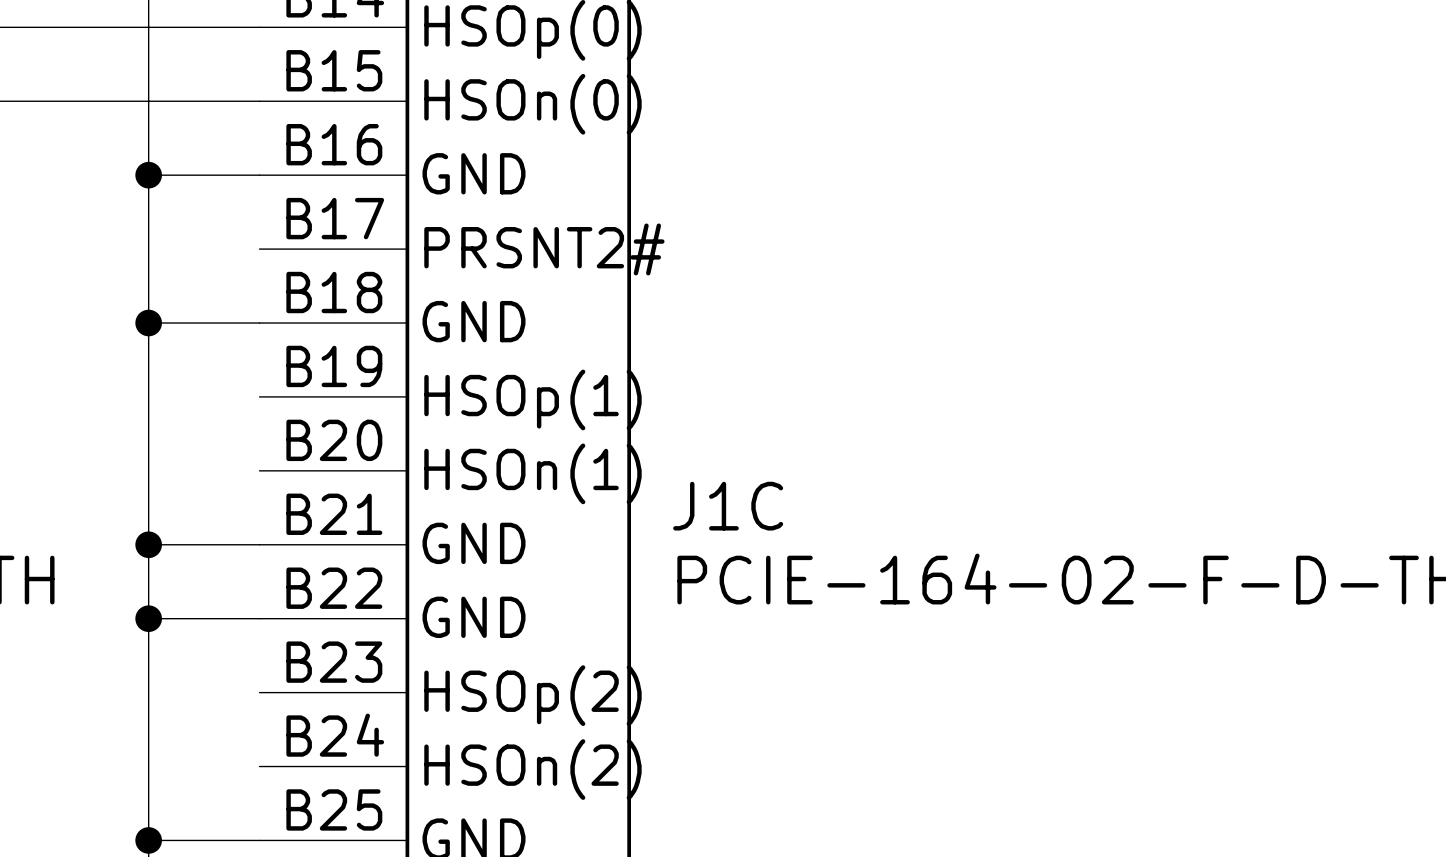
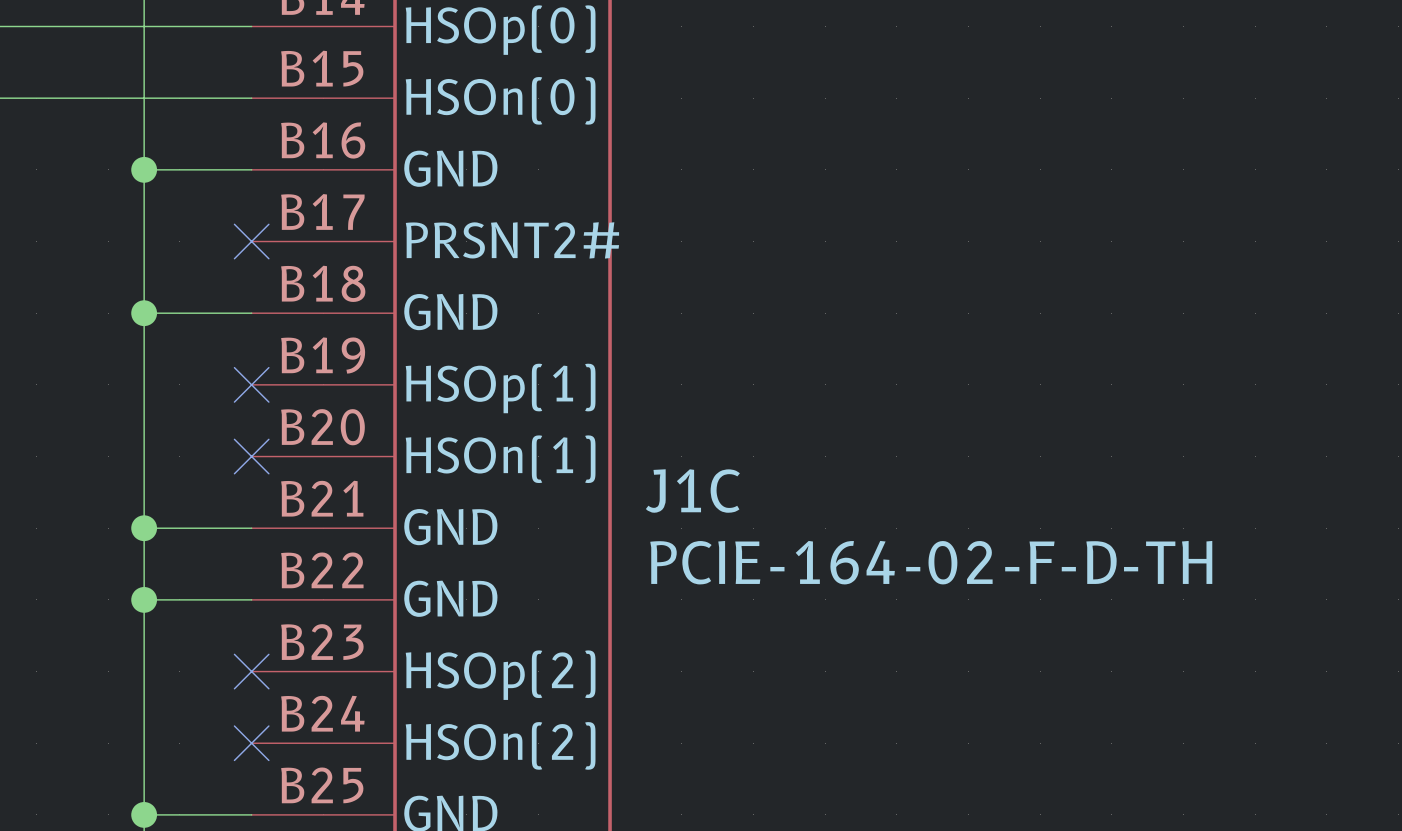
no-connect mark: none -> (251, 241)
no-connect mark: none -> (251, 384)
no-connect mark: none -> (251, 456)
no-connect mark: none -> (251, 671)
no-connect mark: none -> (251, 743)

